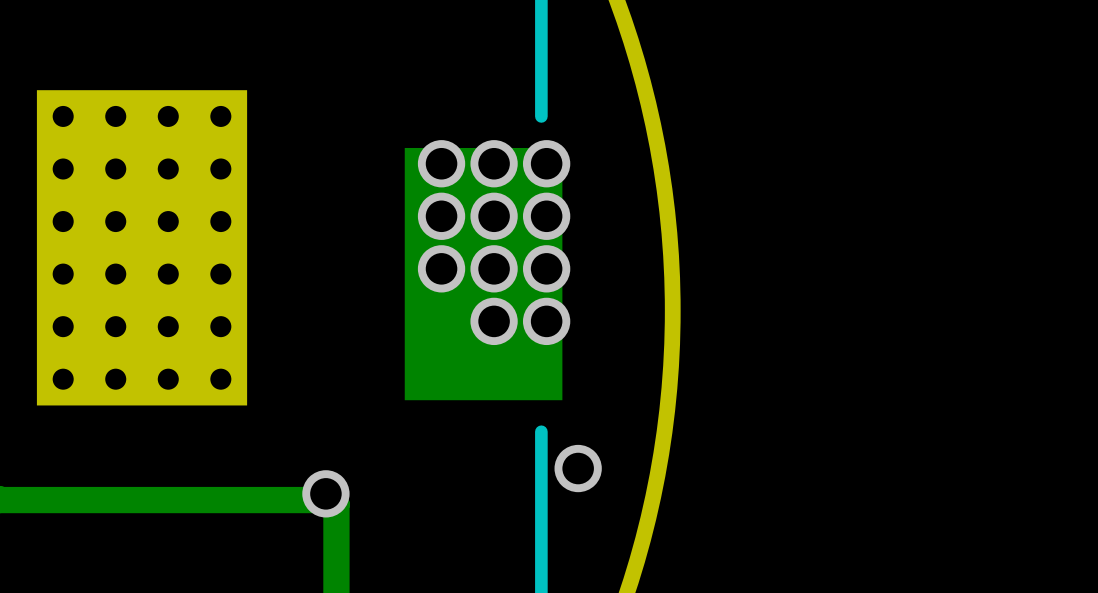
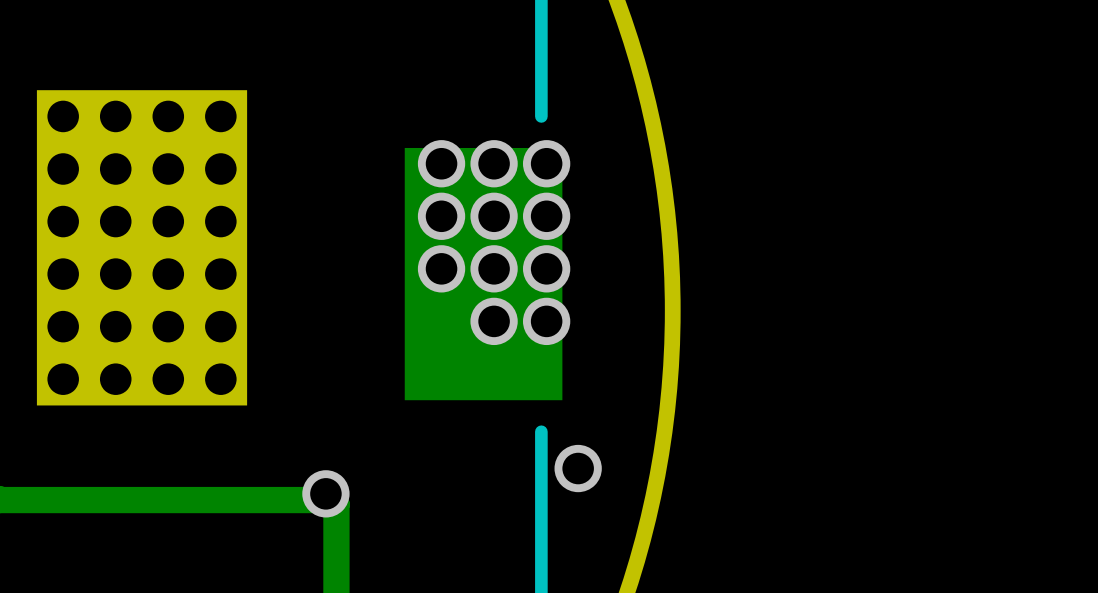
part footprint: [36, 90, 248, 406] -> [36, 90, 248, 406]

